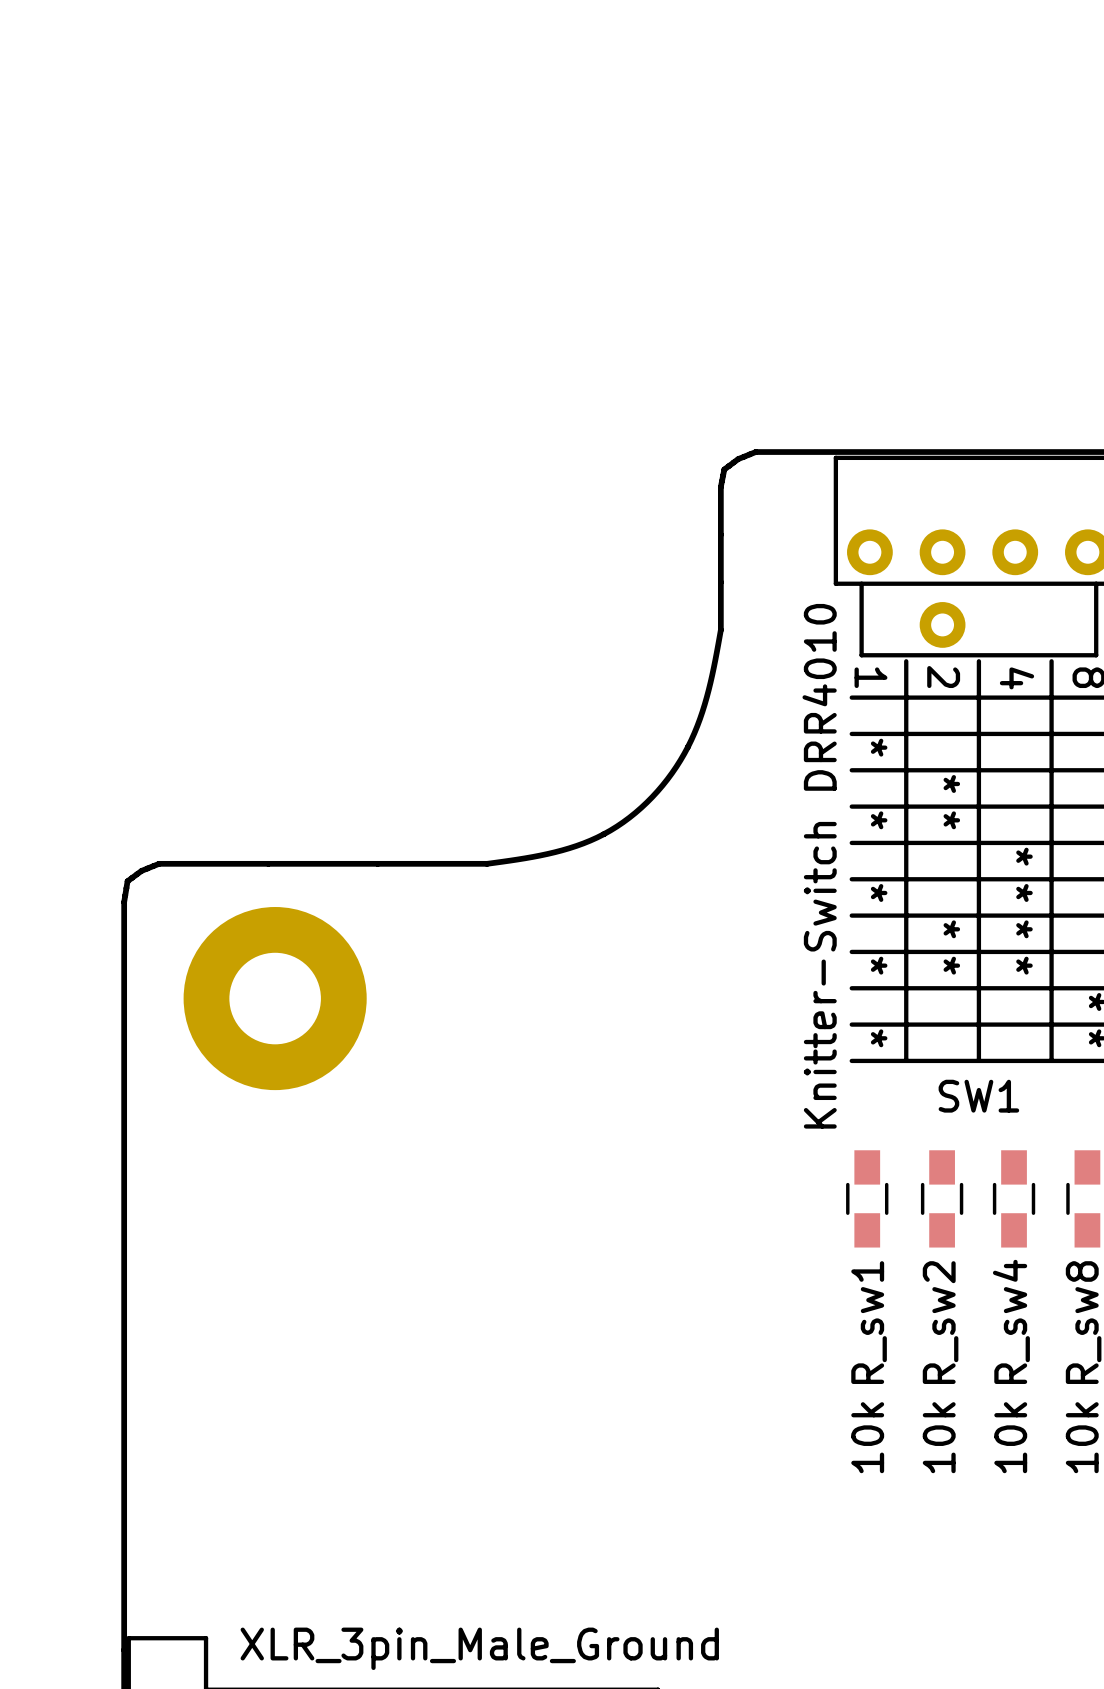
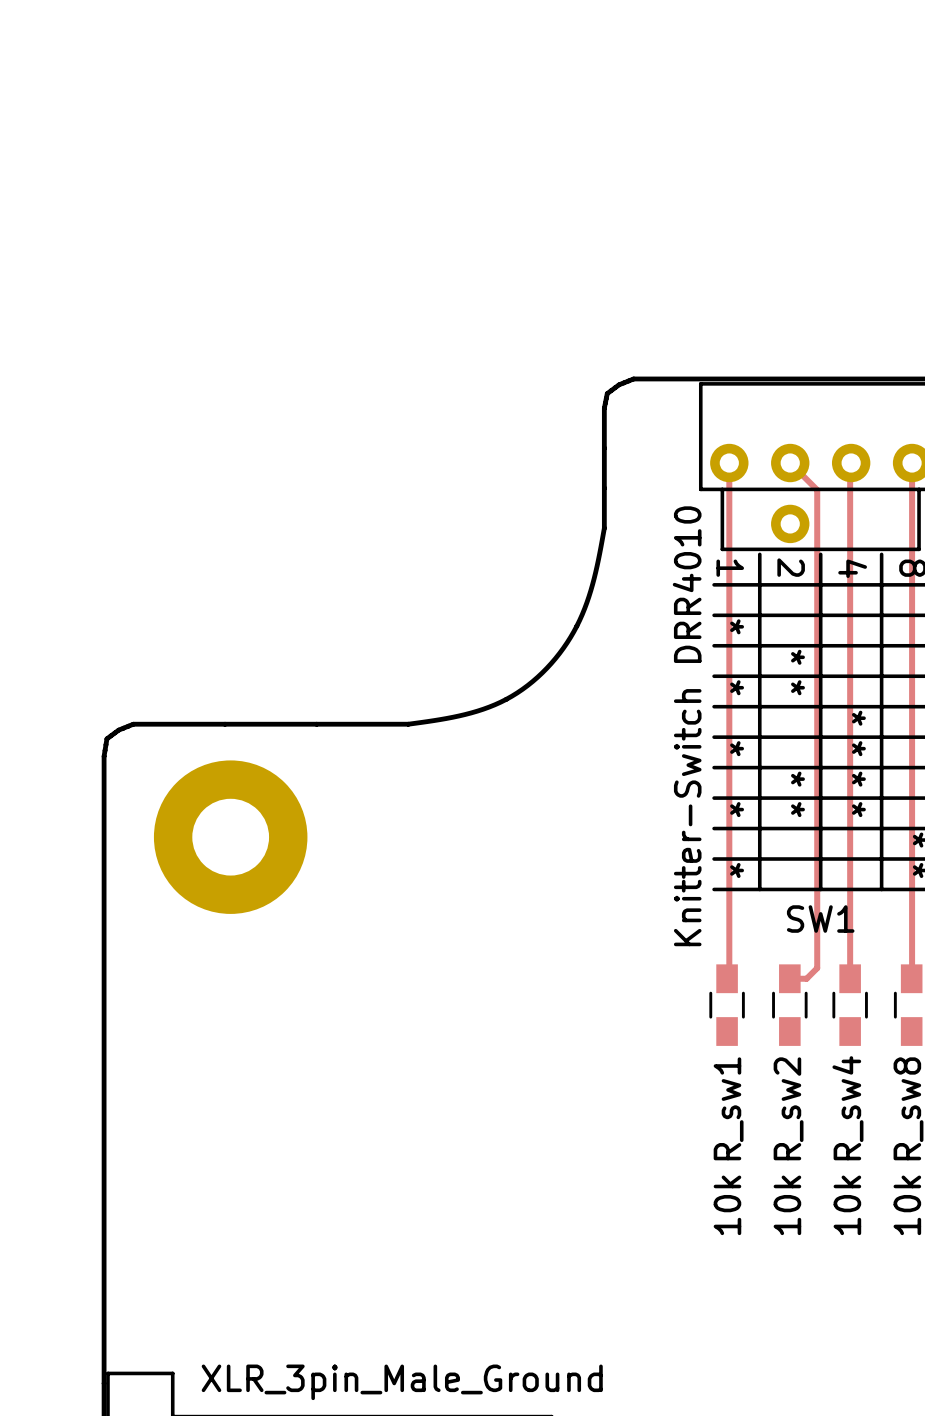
top track: none -> (729, 463) (729, 976) (727, 978)
top track: none -> (790, 463) (817, 489) (817, 968) (806, 978) (789, 978)
top track: none -> (851, 463) (850, 978)
top track: none -> (912, 463) (911, 978)

